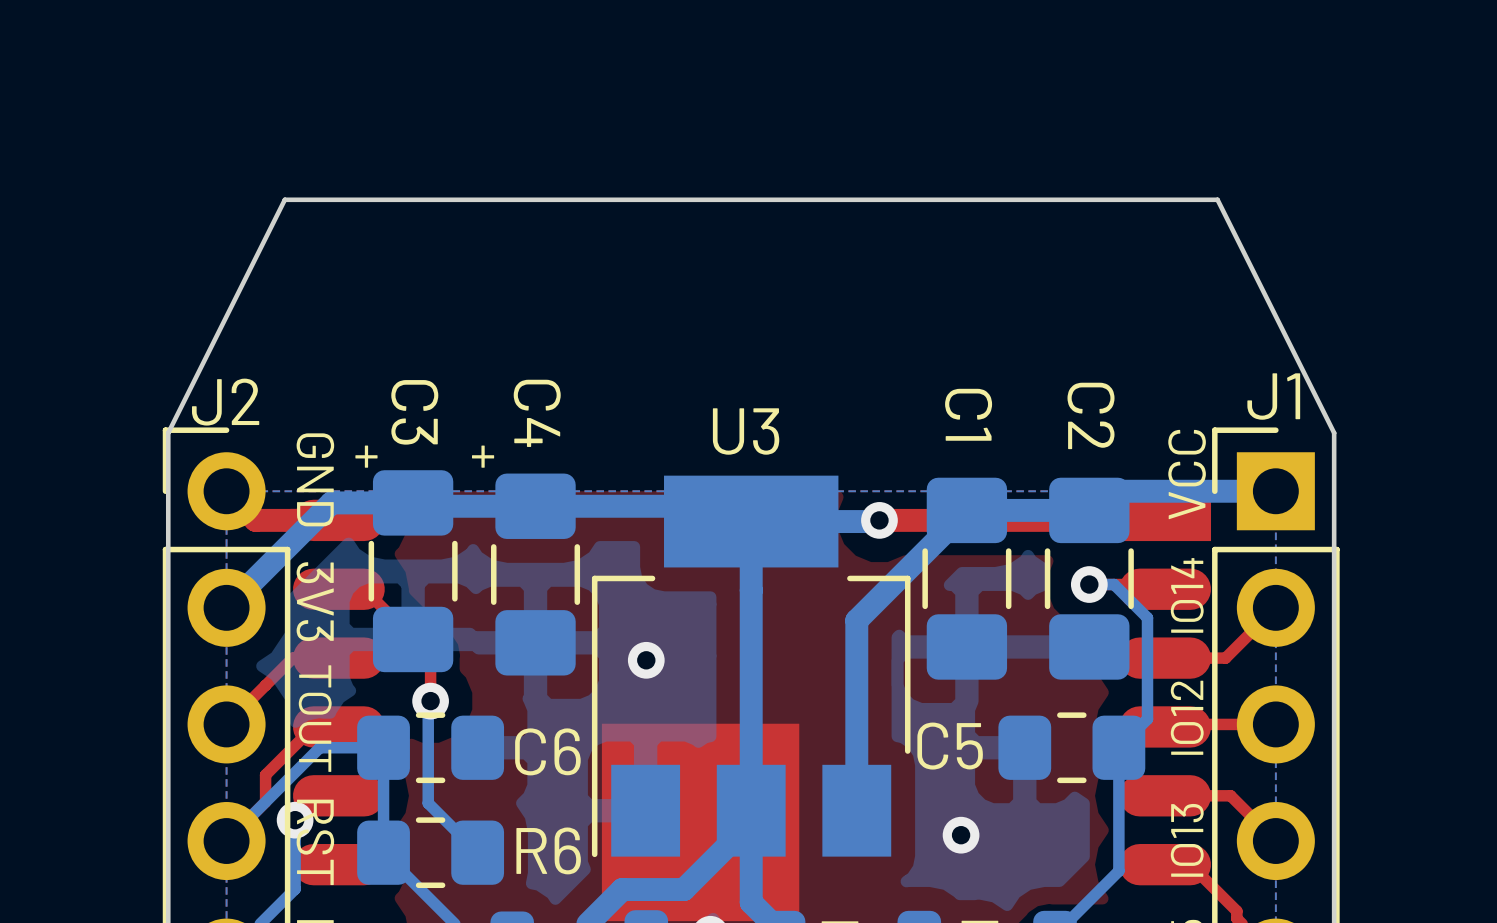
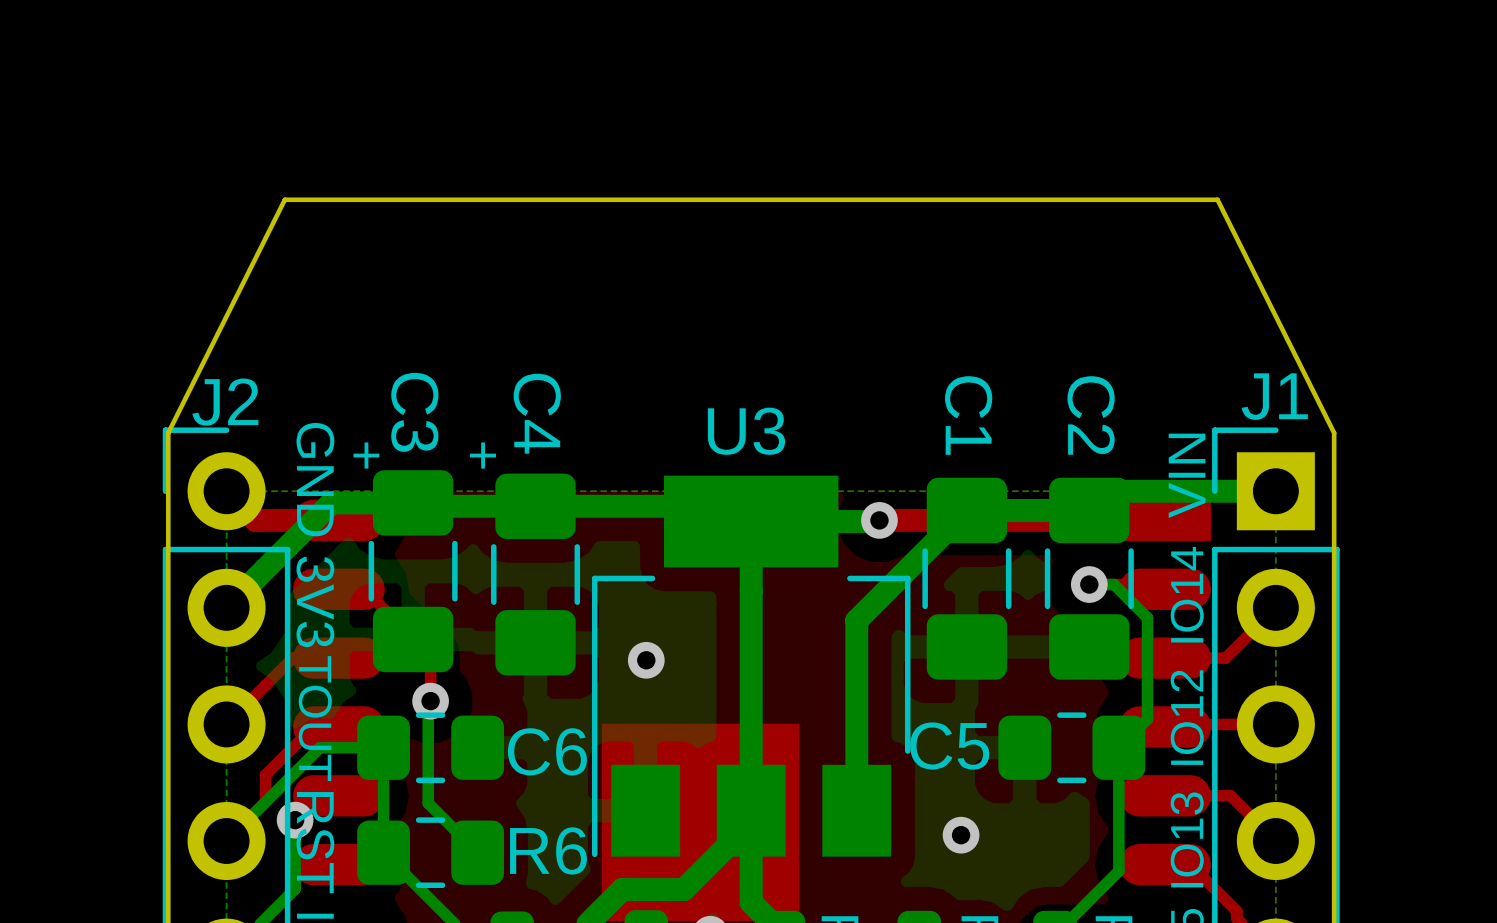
text: VCC (1187, 474) -> VIN (1187, 475)

